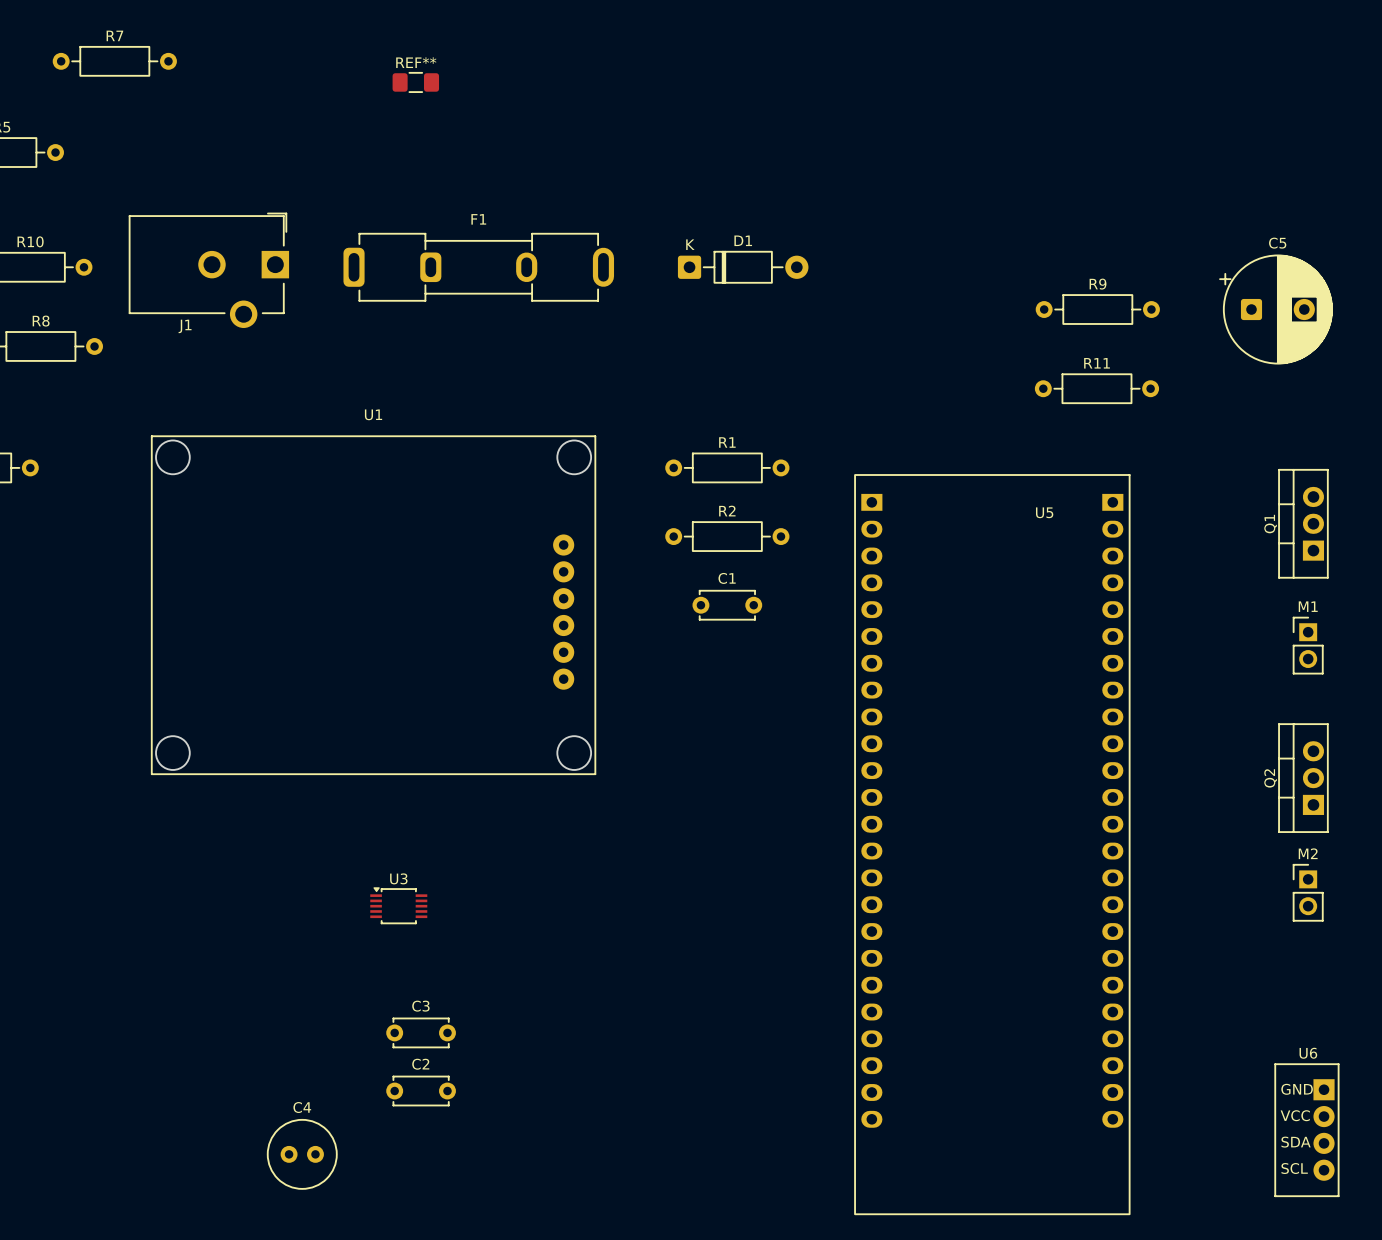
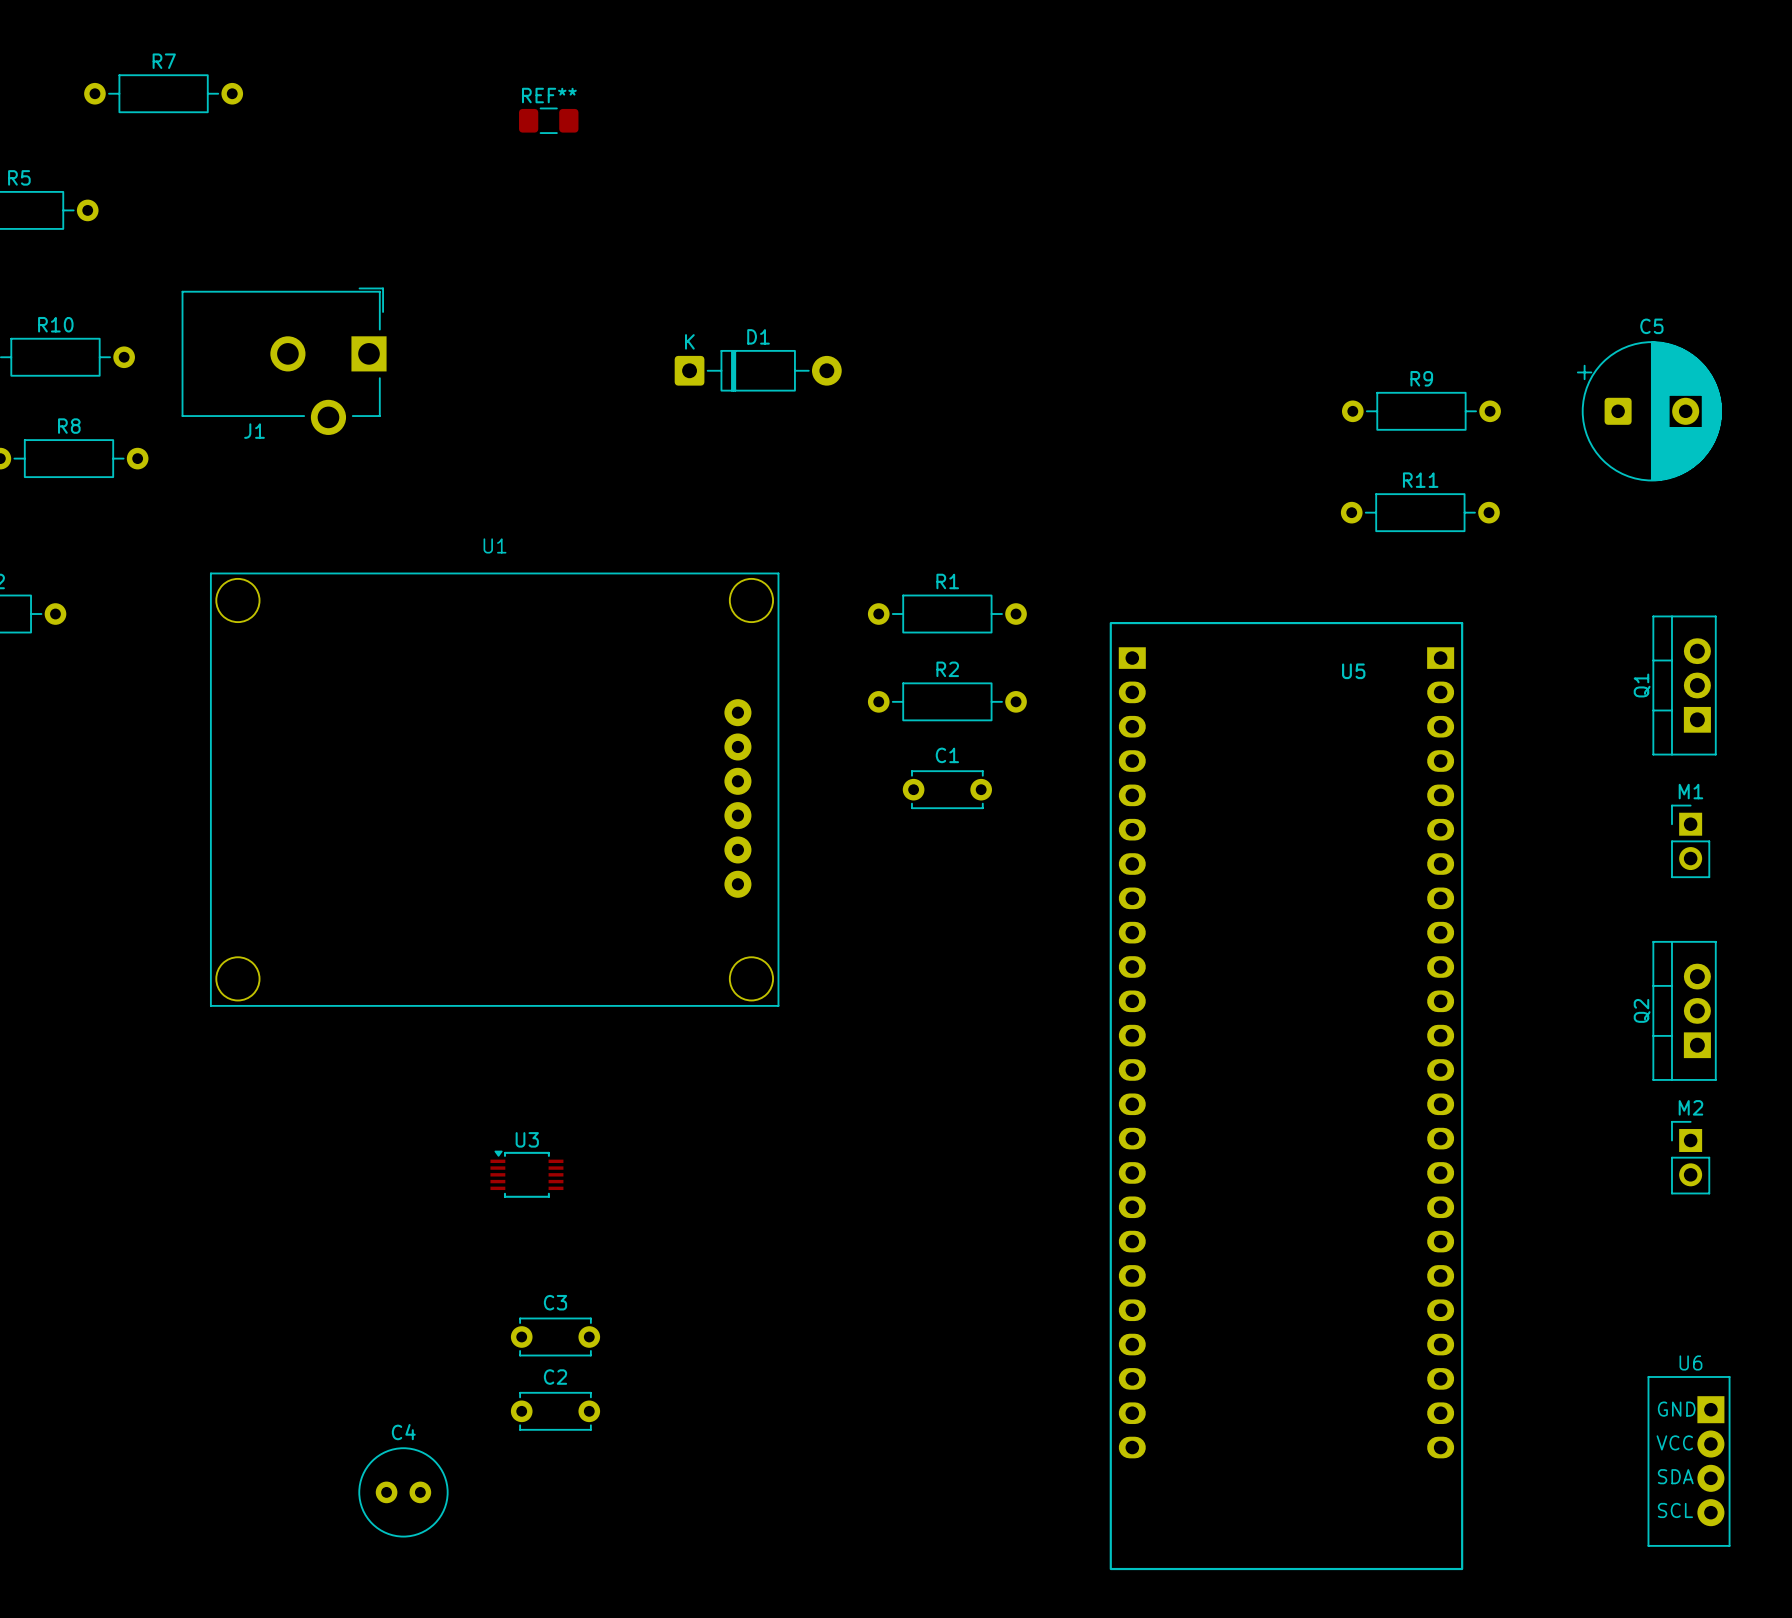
F1: (478, 267) -> none
D1 position: (743, 267) -> (758, 370)

